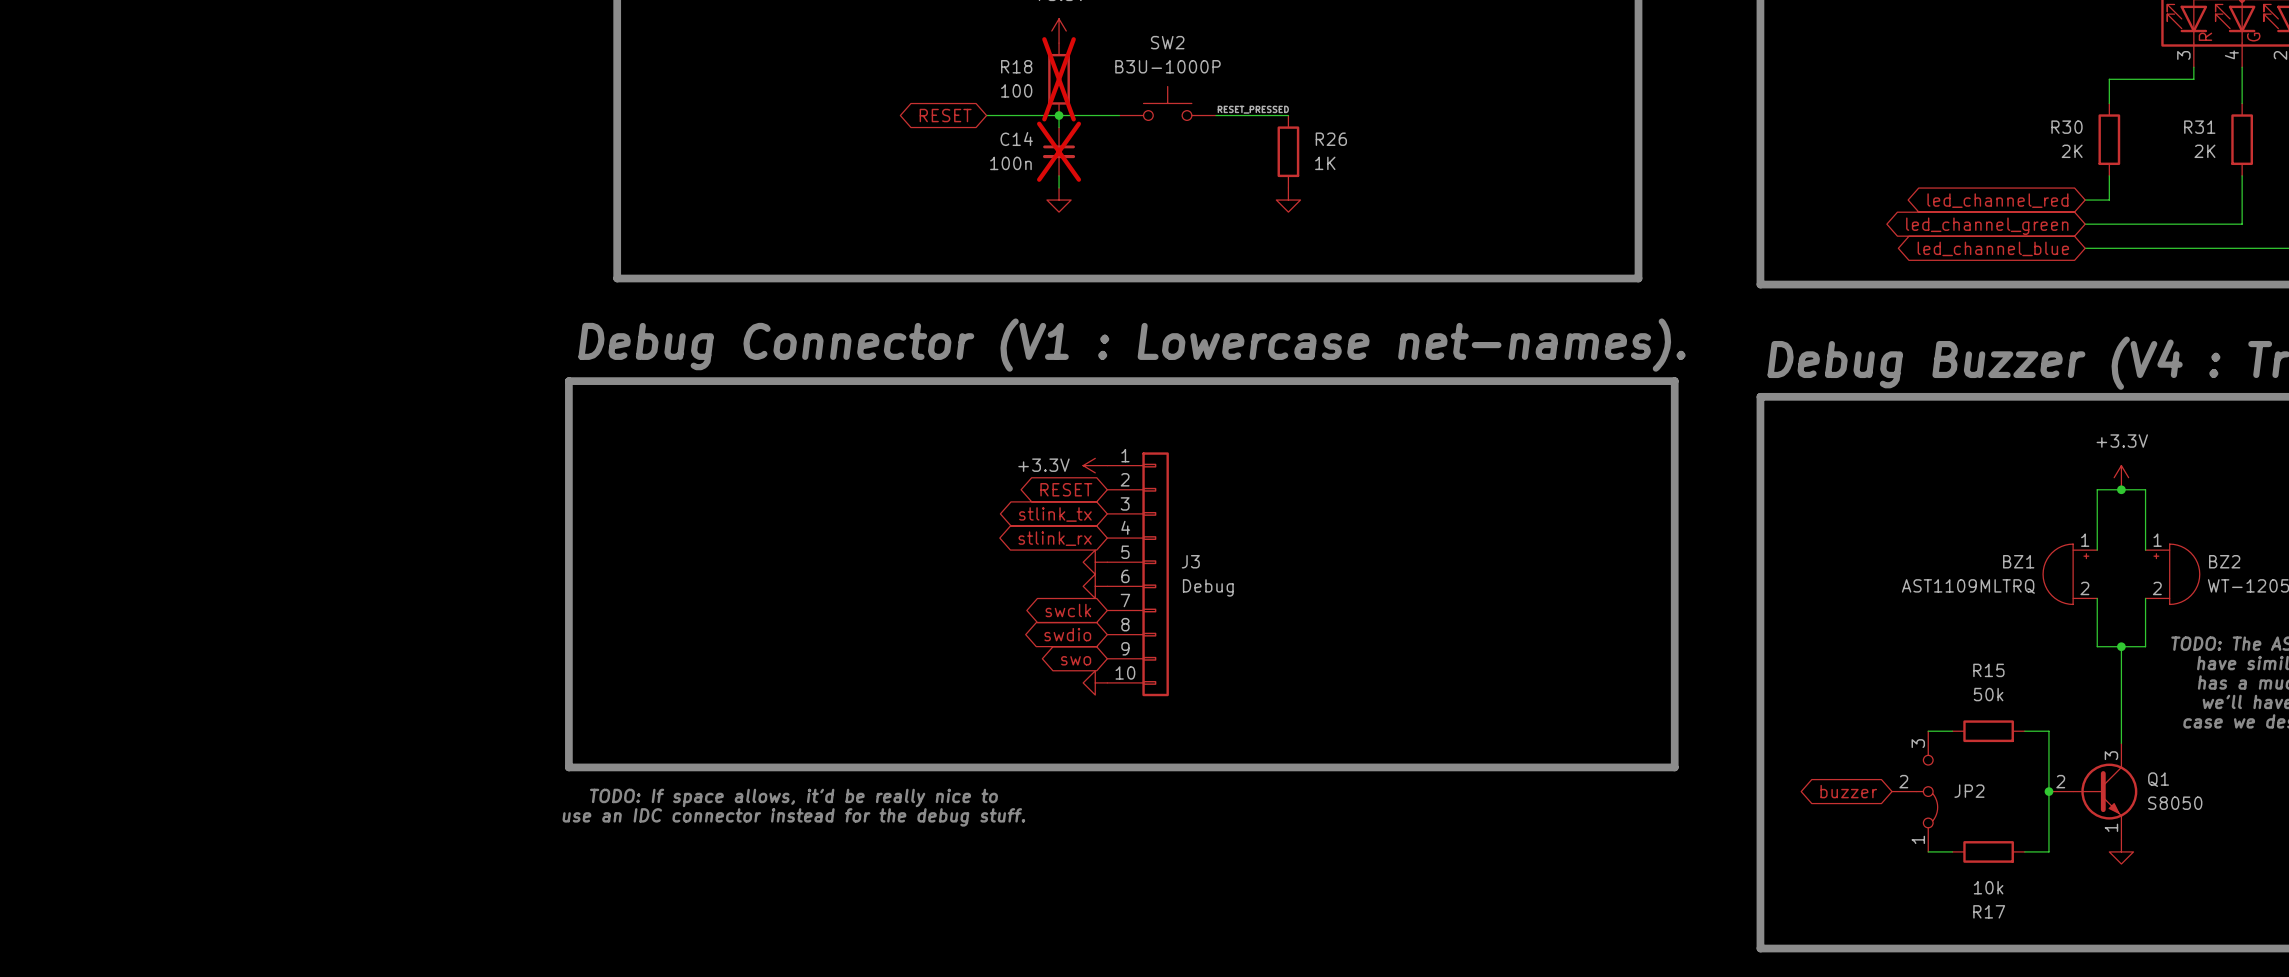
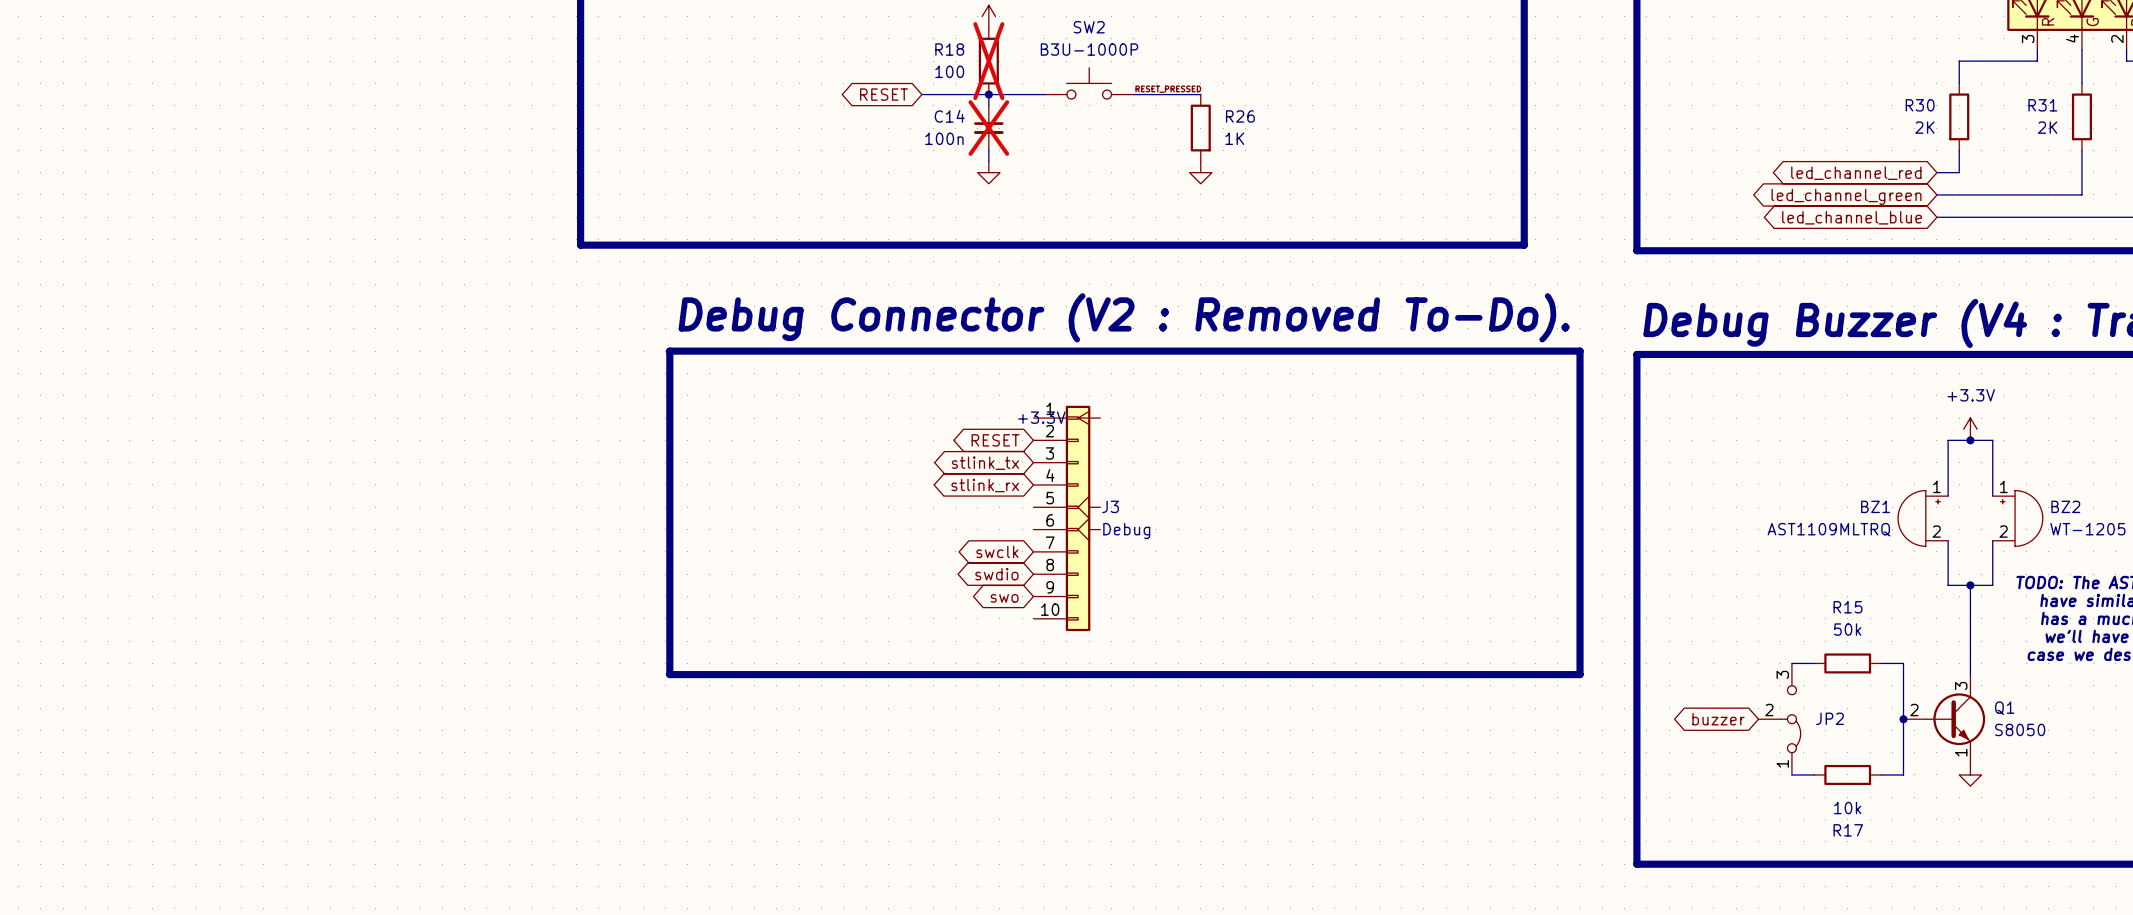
text: Debug Connector (V1 : Lowercase net-names). (1132, 345) -> Debug Connector (V2 : Removed To-Do). (1124, 317)
line: (568, 381) (1674, 381) (1674, 767) (568, 767) (568, 381) -> (669, 351) (669, 674) (1580, 674) (1580, 351) (669, 351)
power symbol position: +3.3V (1095, 465) -> +3.3V (1089, 418)
power symbol: (1095, 562) -> none
power symbol: none -> (1089, 507)
power symbol: (1095, 586) -> none
power symbol: none -> (1089, 529)
power symbol: (1095, 682) -> none
text: TODO: If space allows, it'd be really nice to (793, 797) -> none
text: use an IDC connector instead for the debug stuff. (793, 817) -> none

